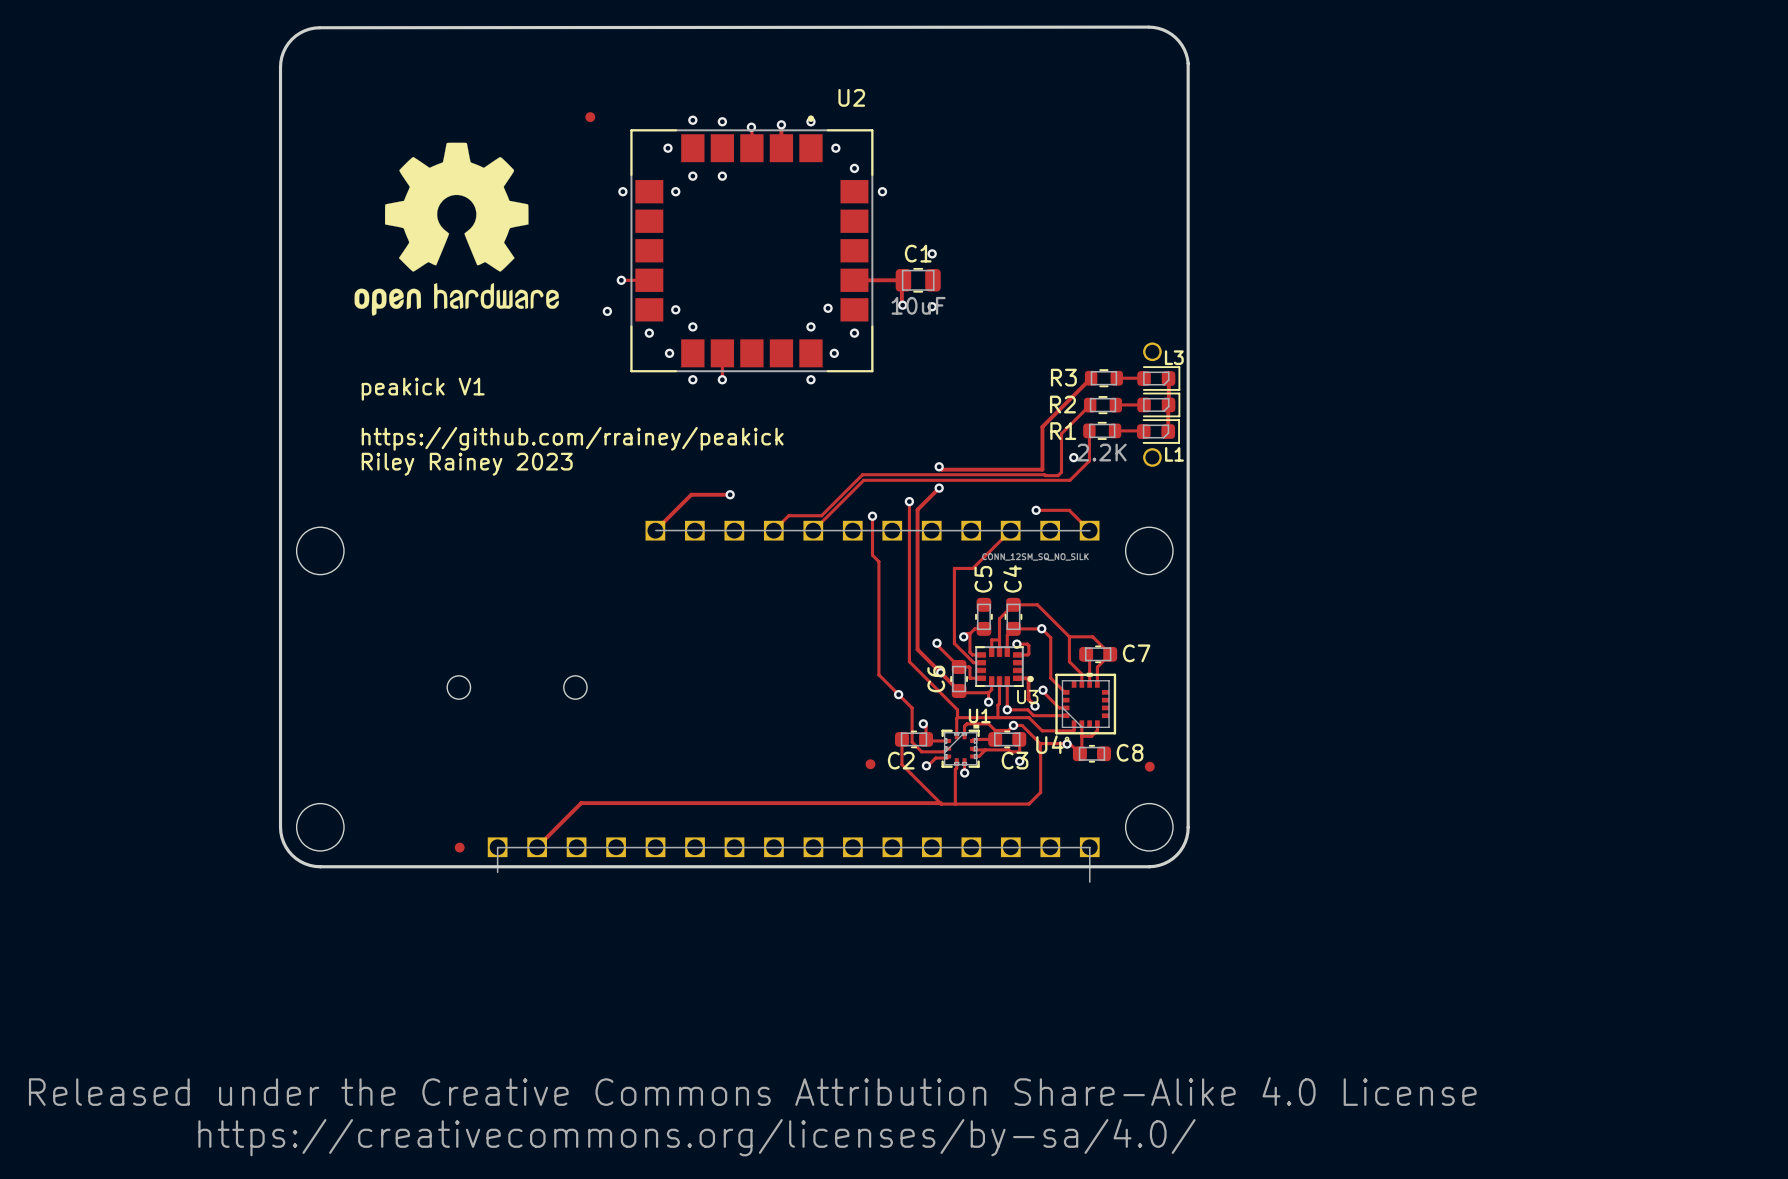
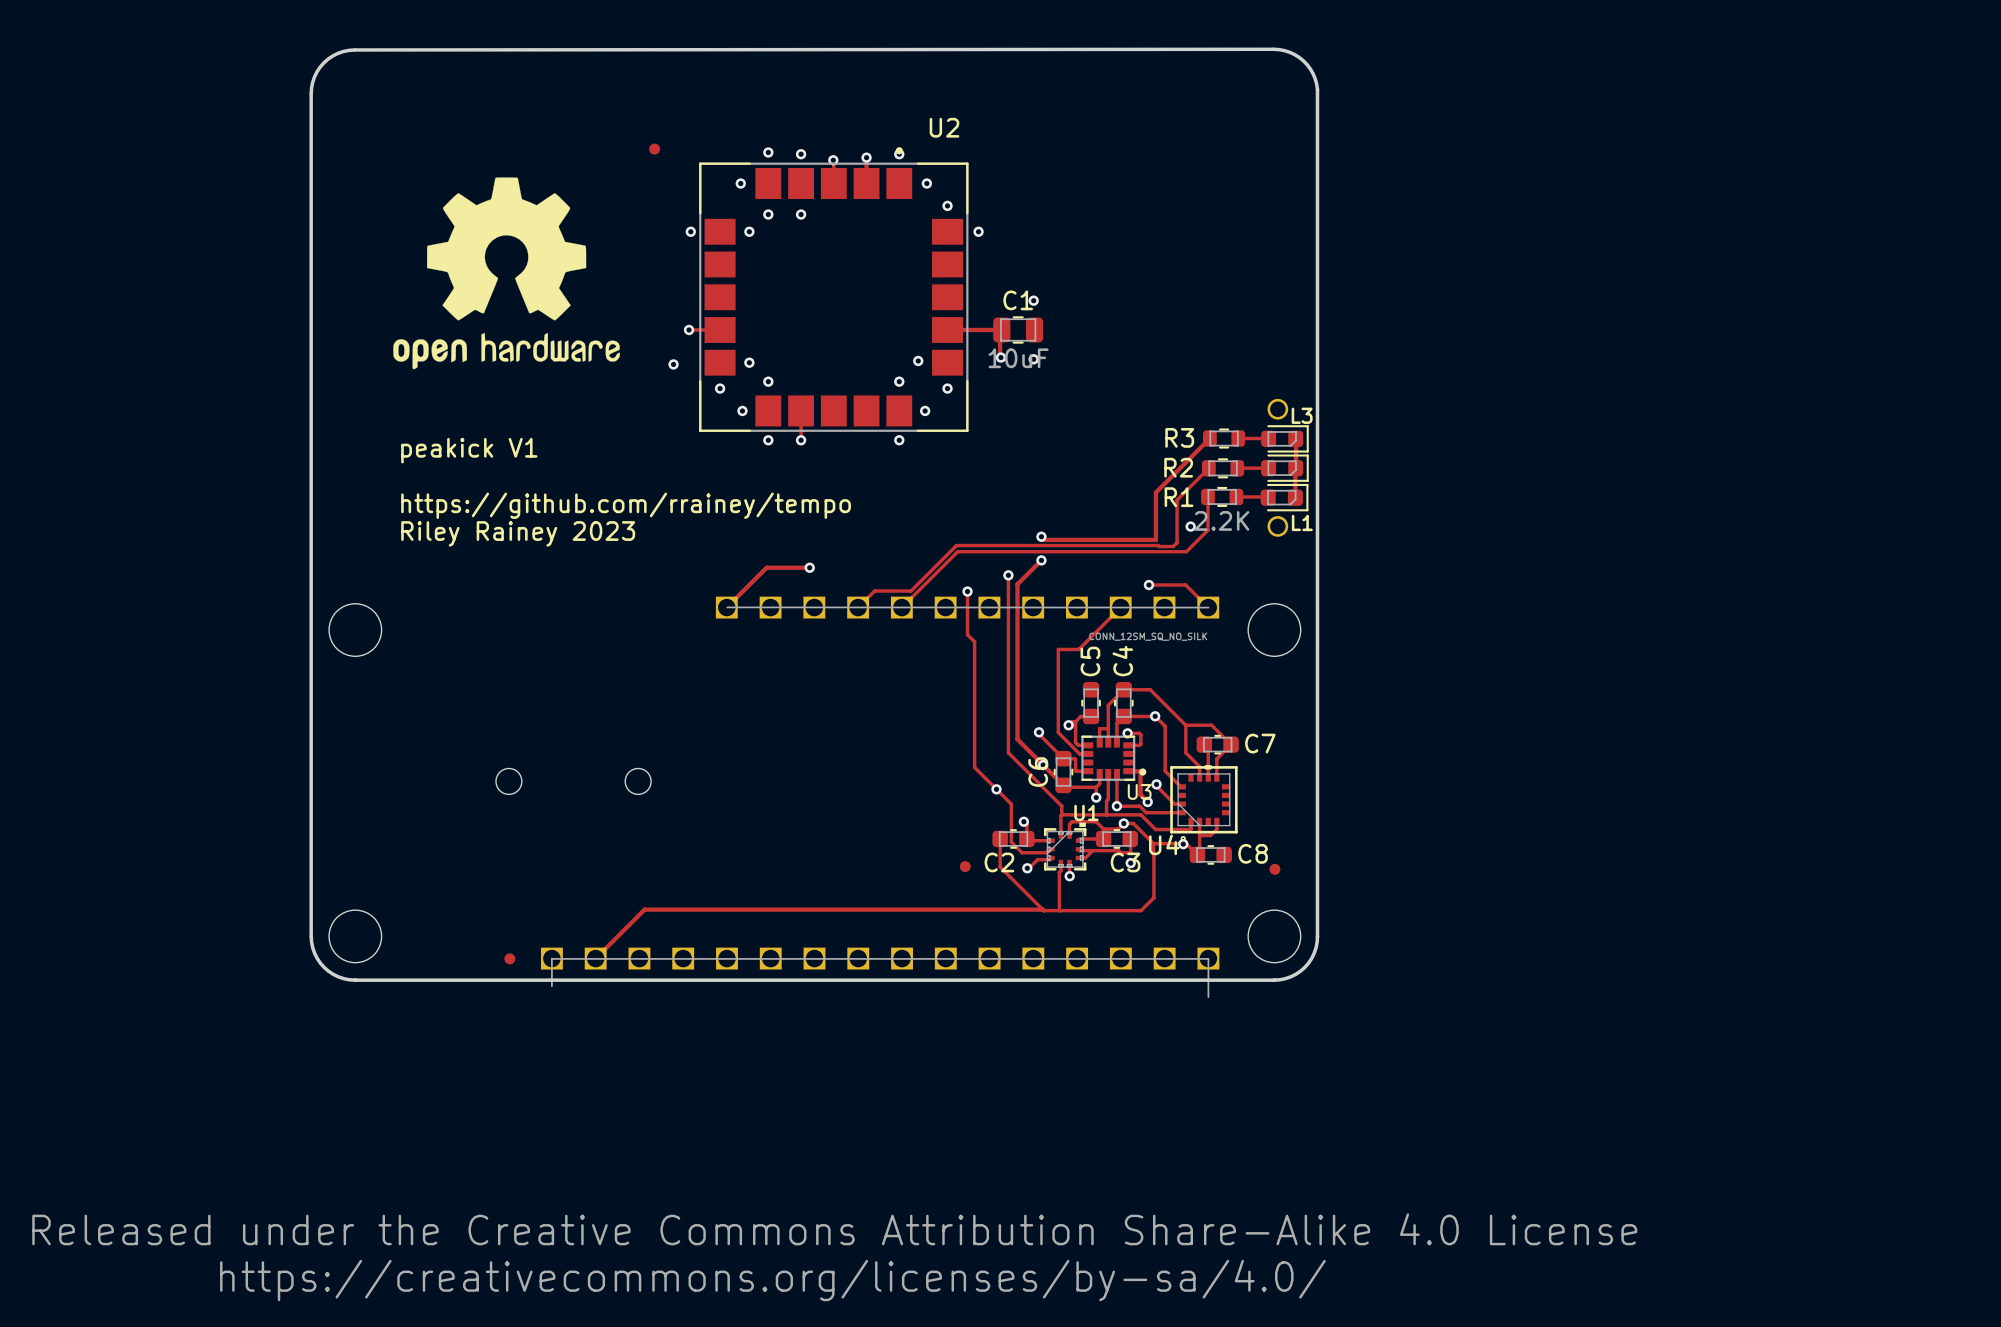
text: https://github.com/rrainey/peakick (572, 438) -> https://github.com/rrainey/tempo (626, 505)

